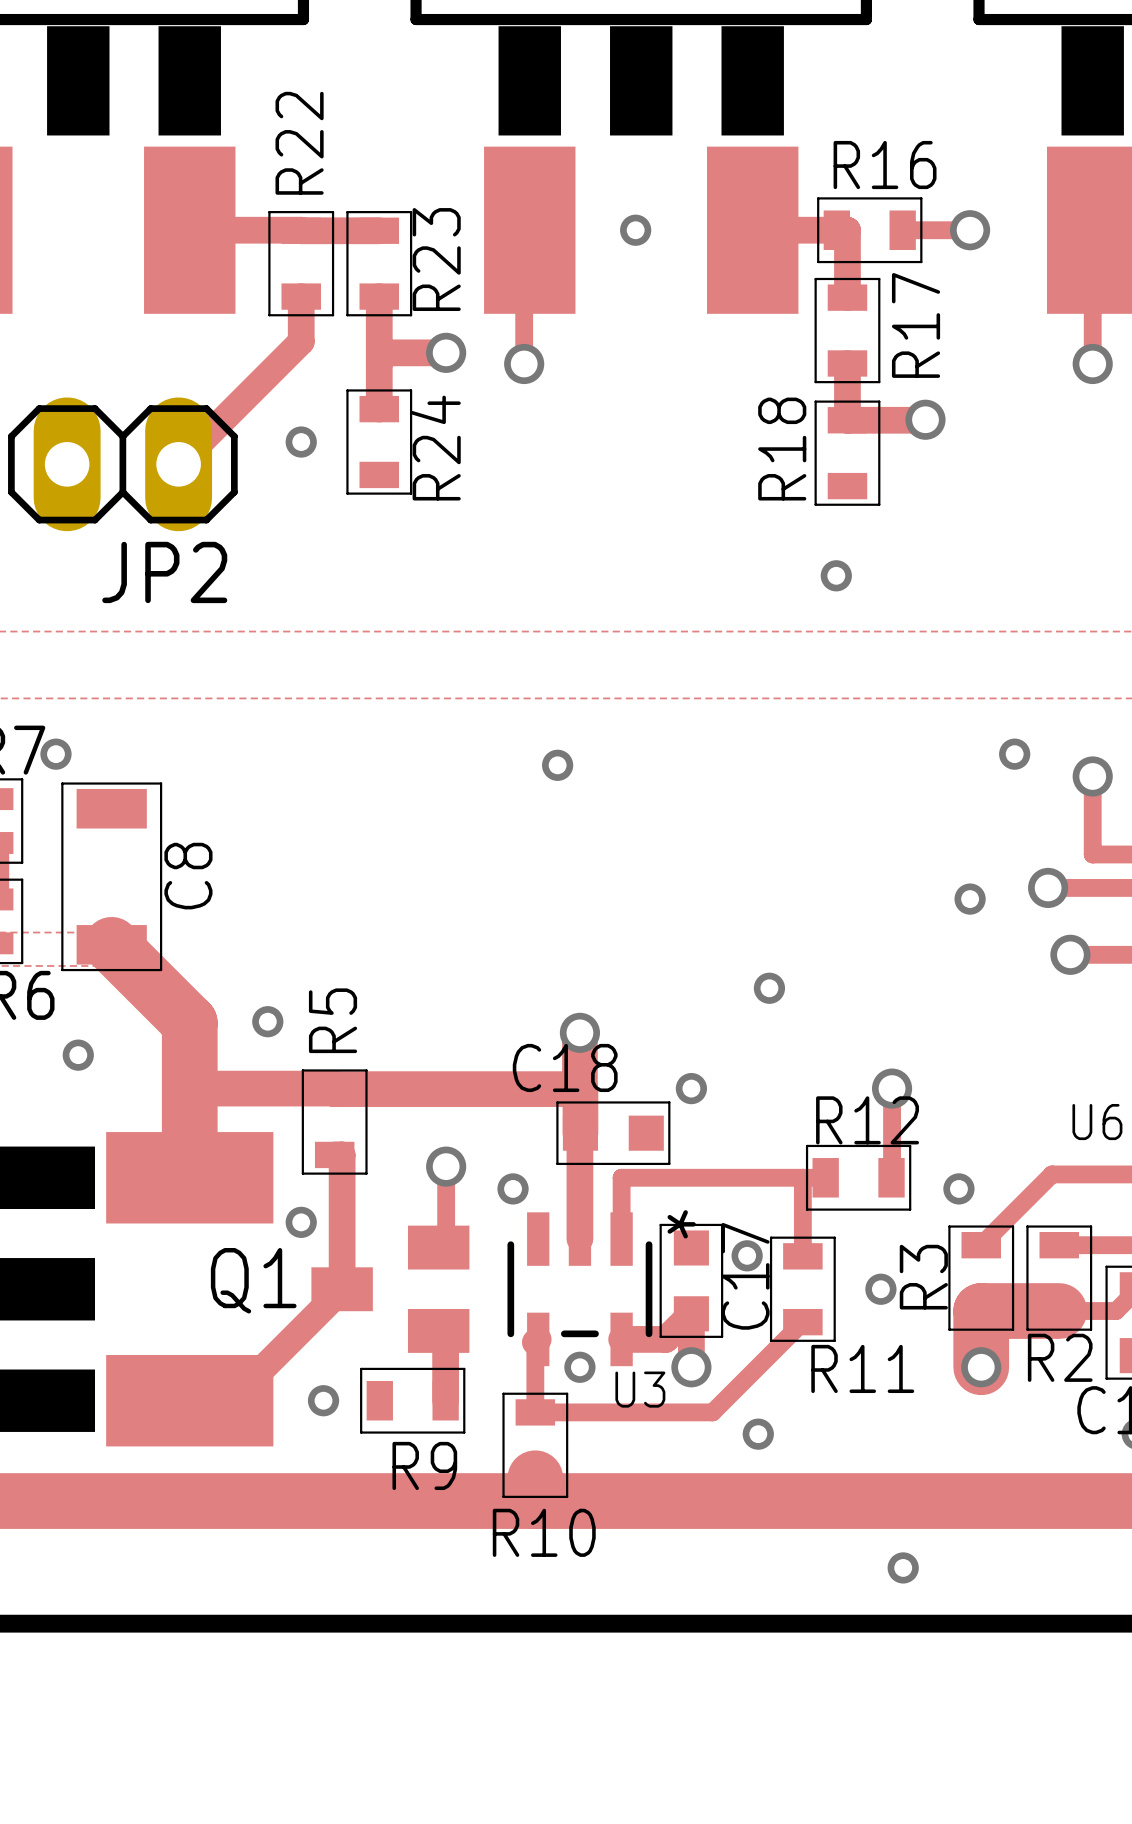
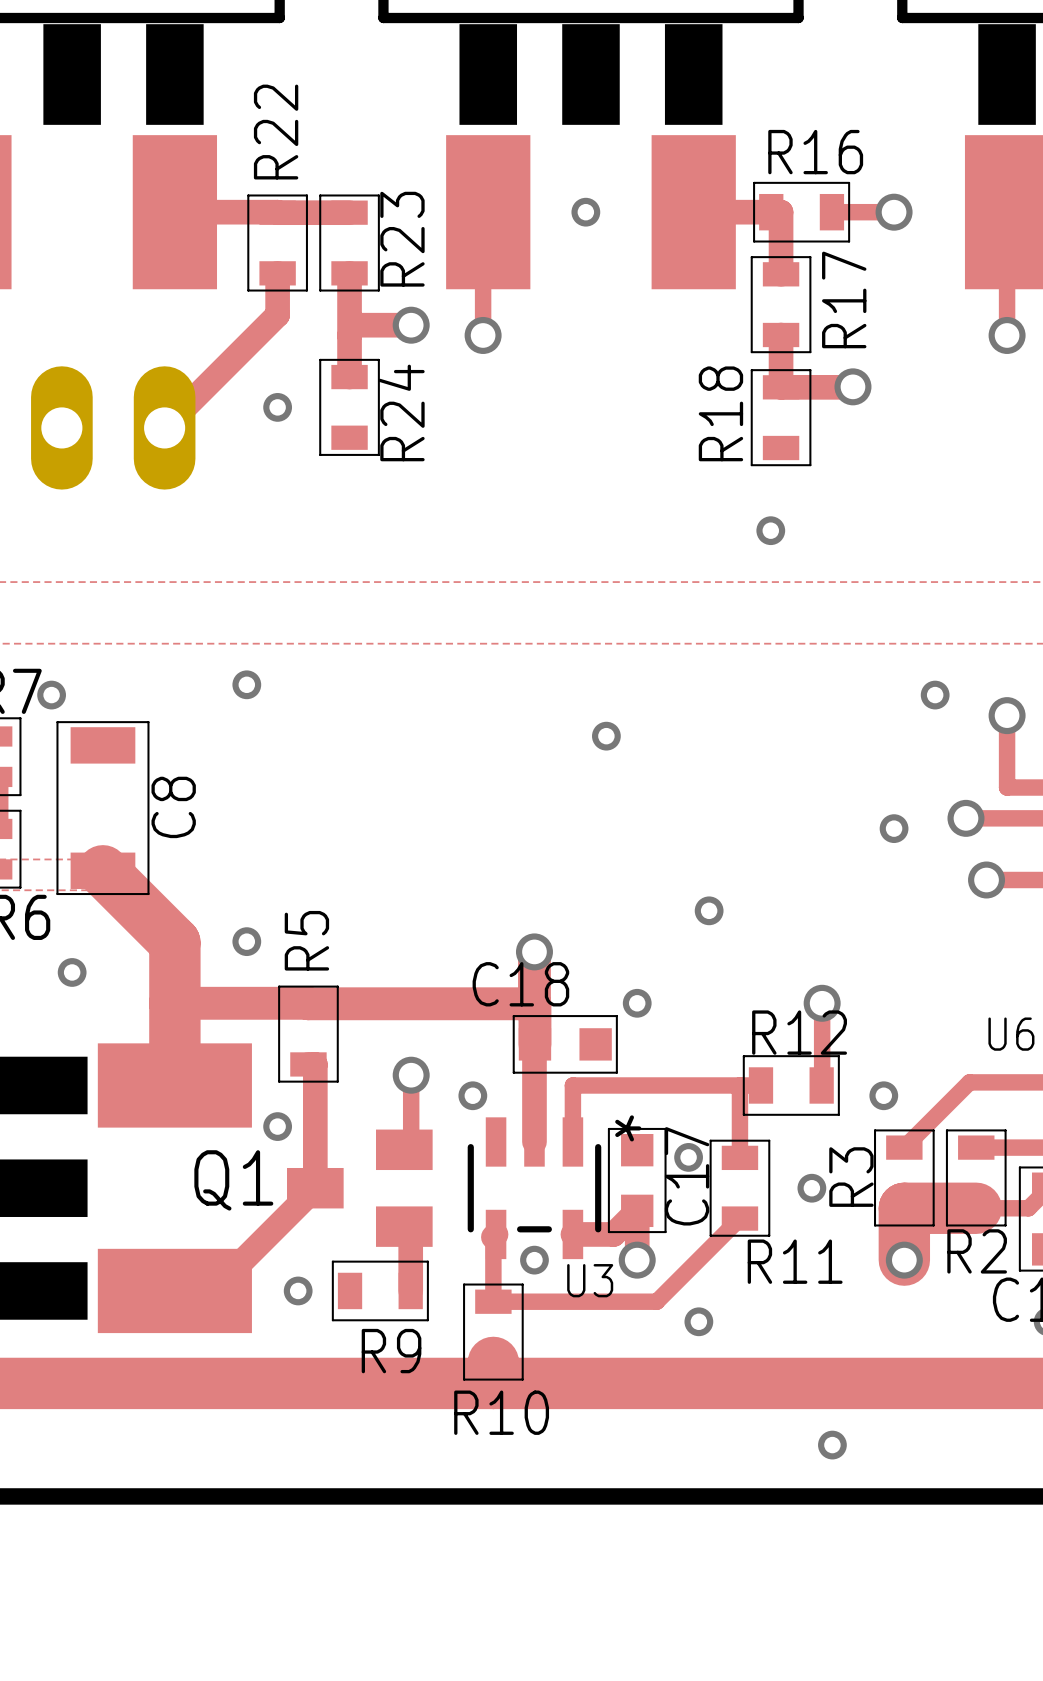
JP2 side: top (122, 464) -> bottom (113, 427)
via: none -> (246, 684)
via position: (557, 765) -> (606, 736)

